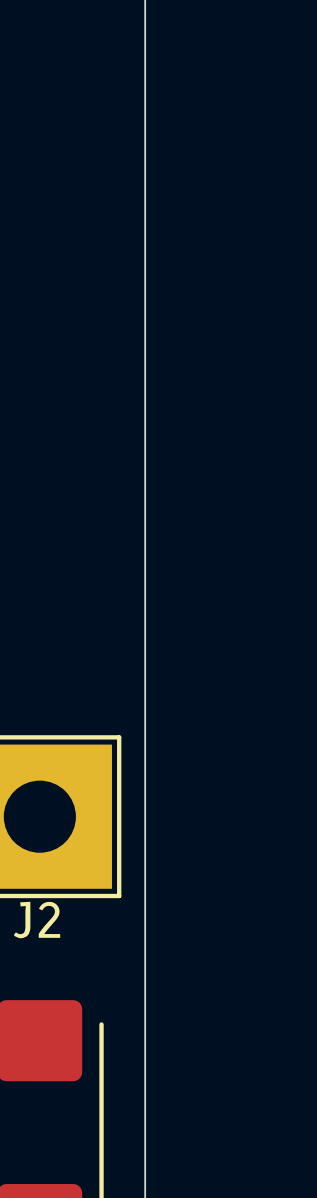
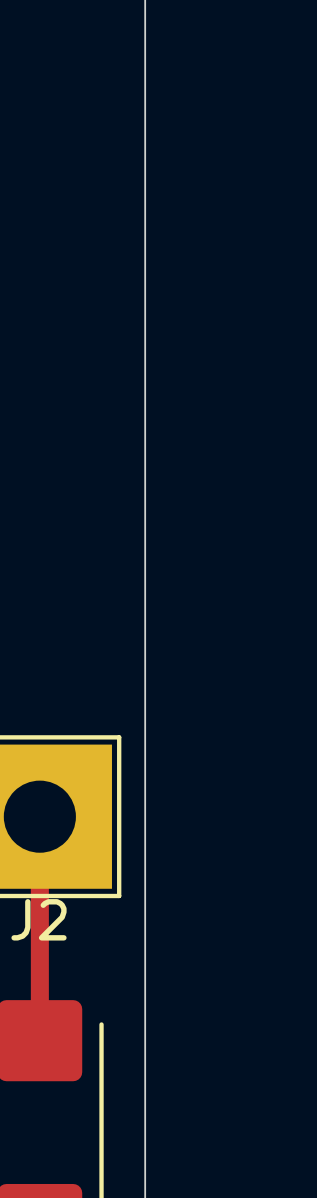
top track: none -> (39, 816) (39, 1040)

